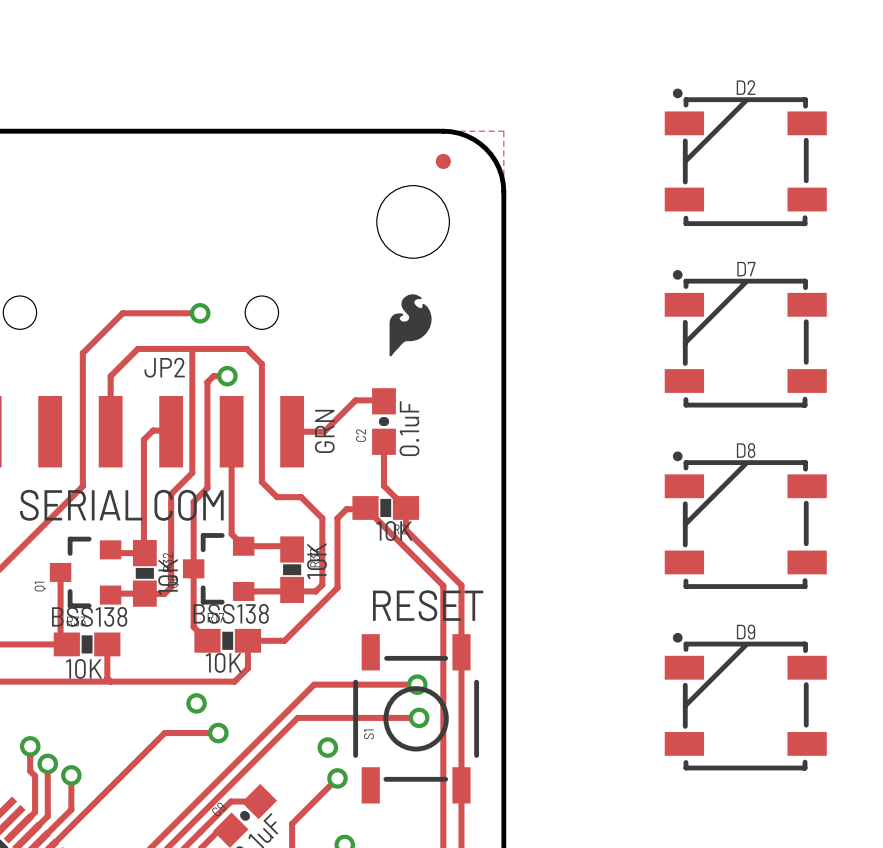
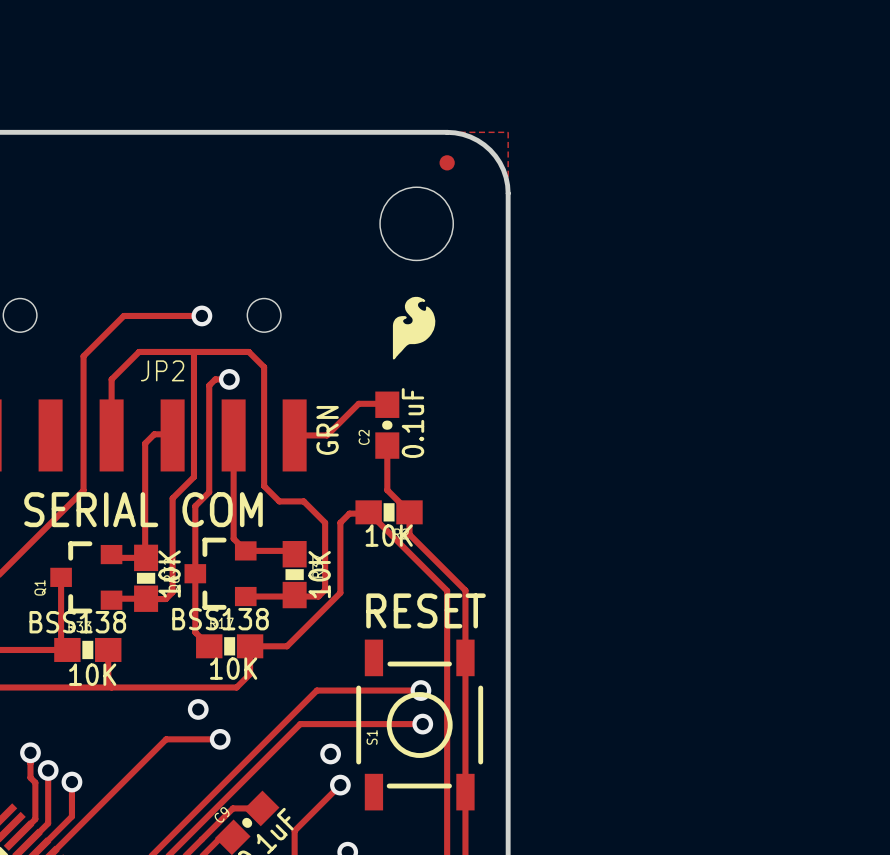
D2: (745, 157) -> none
D7: (745, 338) -> none
D8: (745, 520) -> none
D9: (745, 701) -> none

